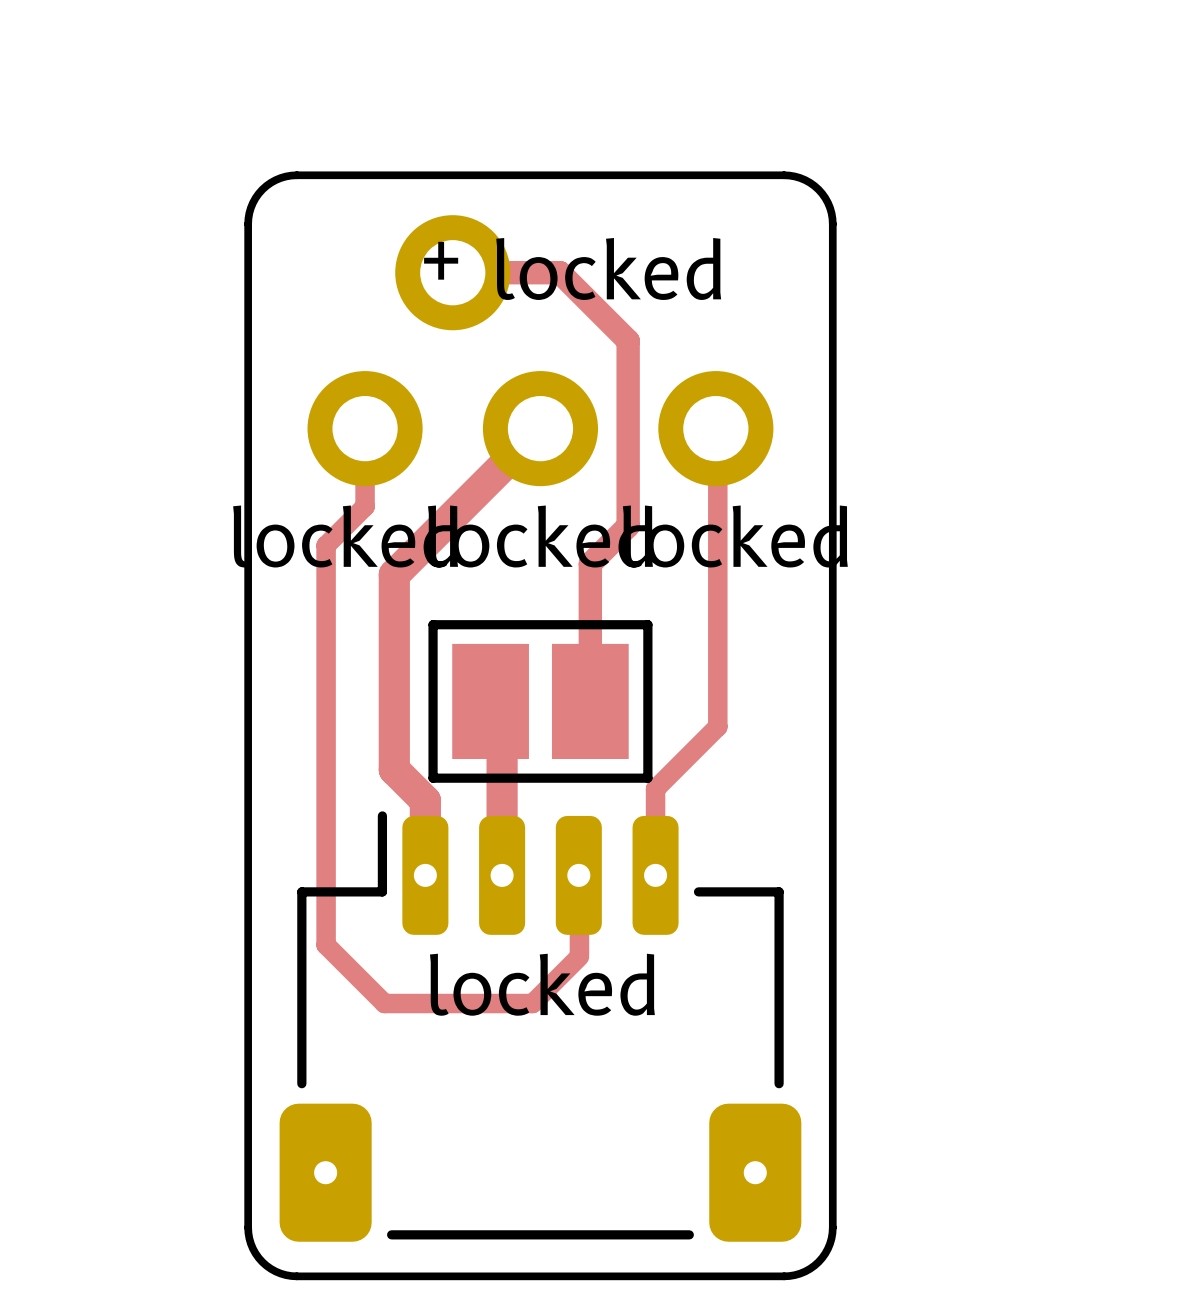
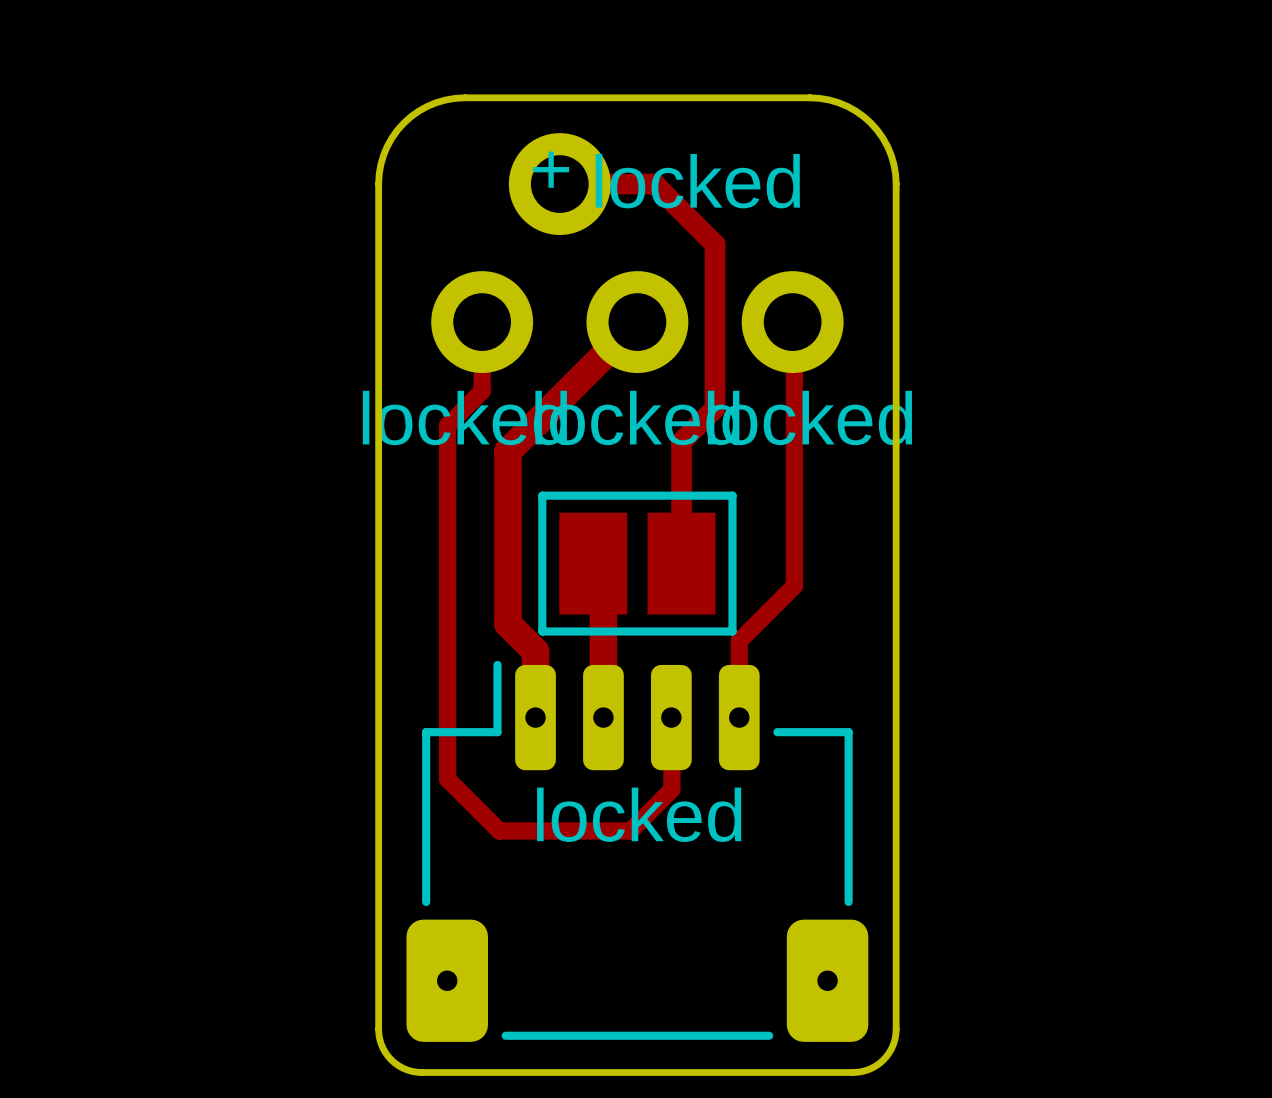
board edge: (345, 175) (286, 176) (275, 180) (262, 189) (252, 202) (249, 213) (248, 272) -> (464, 97) (436, 102) (419, 111) (403, 123) (391, 138) (383, 155) (378, 184)
board edge: (735, 175) (794, 176) (805, 180) (818, 189) (825, 198) (831, 213) (832, 272) -> (809, 97) (829, 99) (847, 106) (870, 123) (882, 138) (891, 155) (896, 184)

